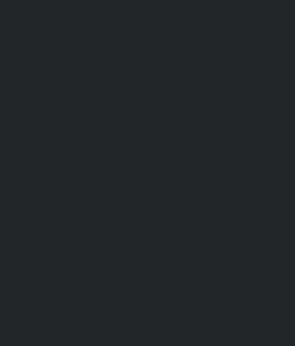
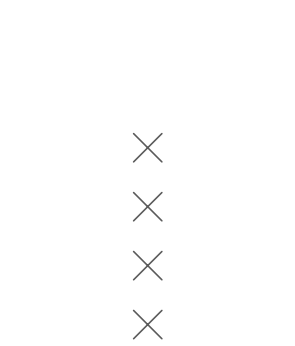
no-connect mark: none -> (147, 147)
no-connect mark: none -> (147, 206)
no-connect mark: none -> (147, 265)
no-connect mark: none -> (147, 324)

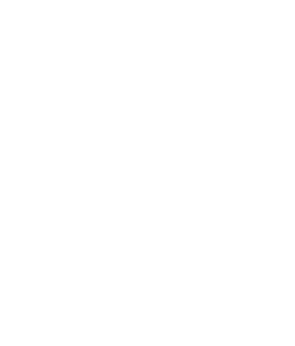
no-connect mark: (147, 147) -> none
no-connect mark: (147, 206) -> none
no-connect mark: (147, 265) -> none
no-connect mark: (147, 324) -> none

